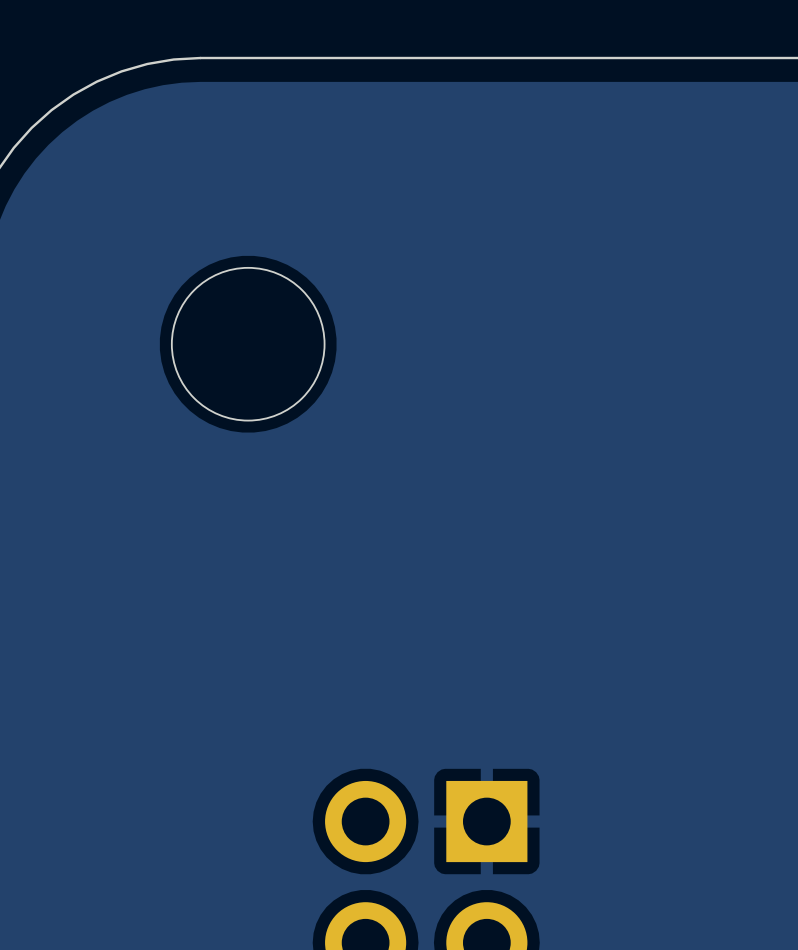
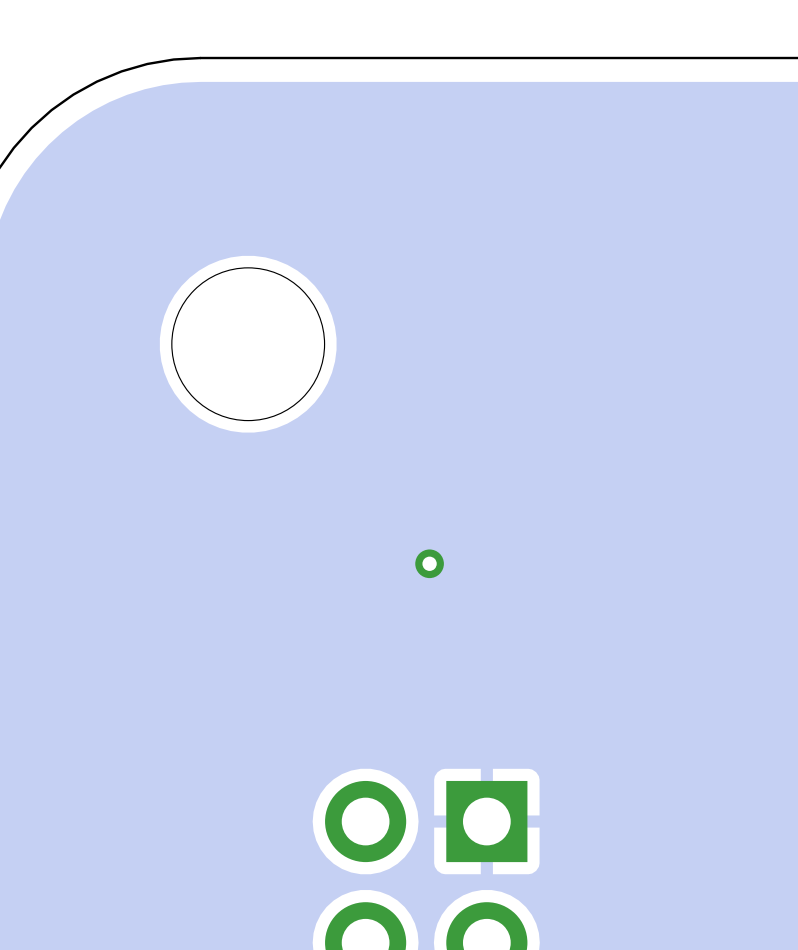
via: none -> (429, 563)

